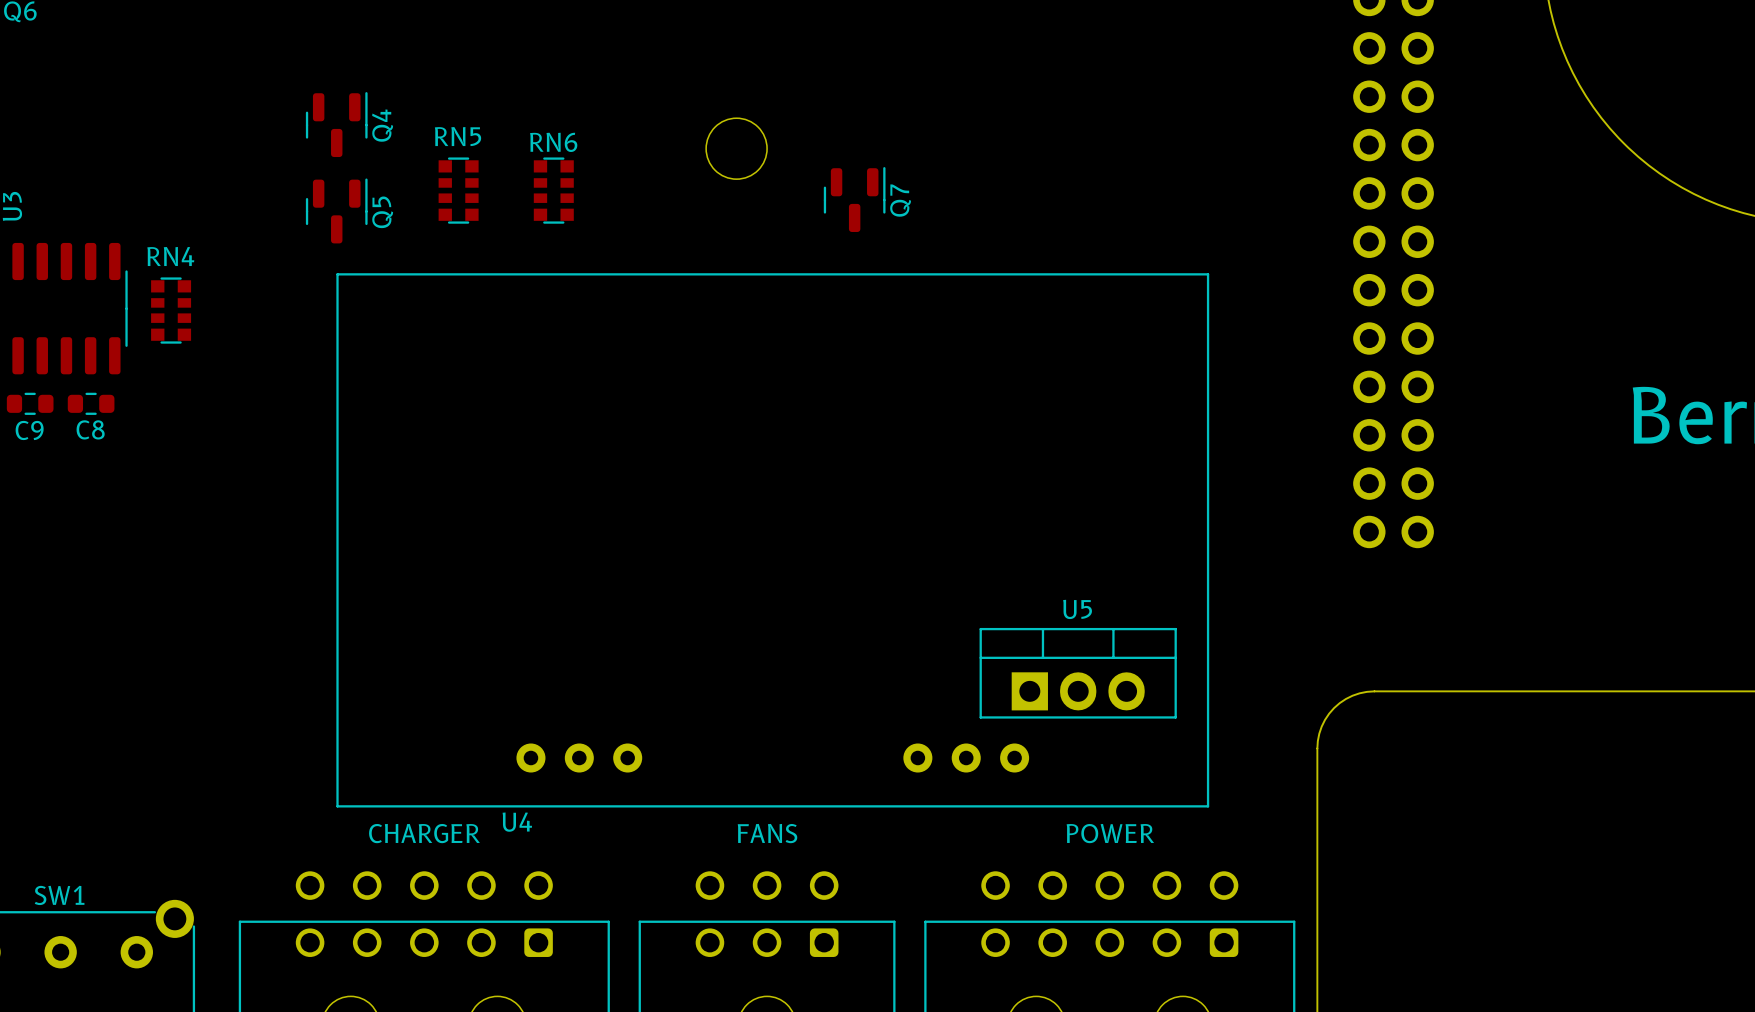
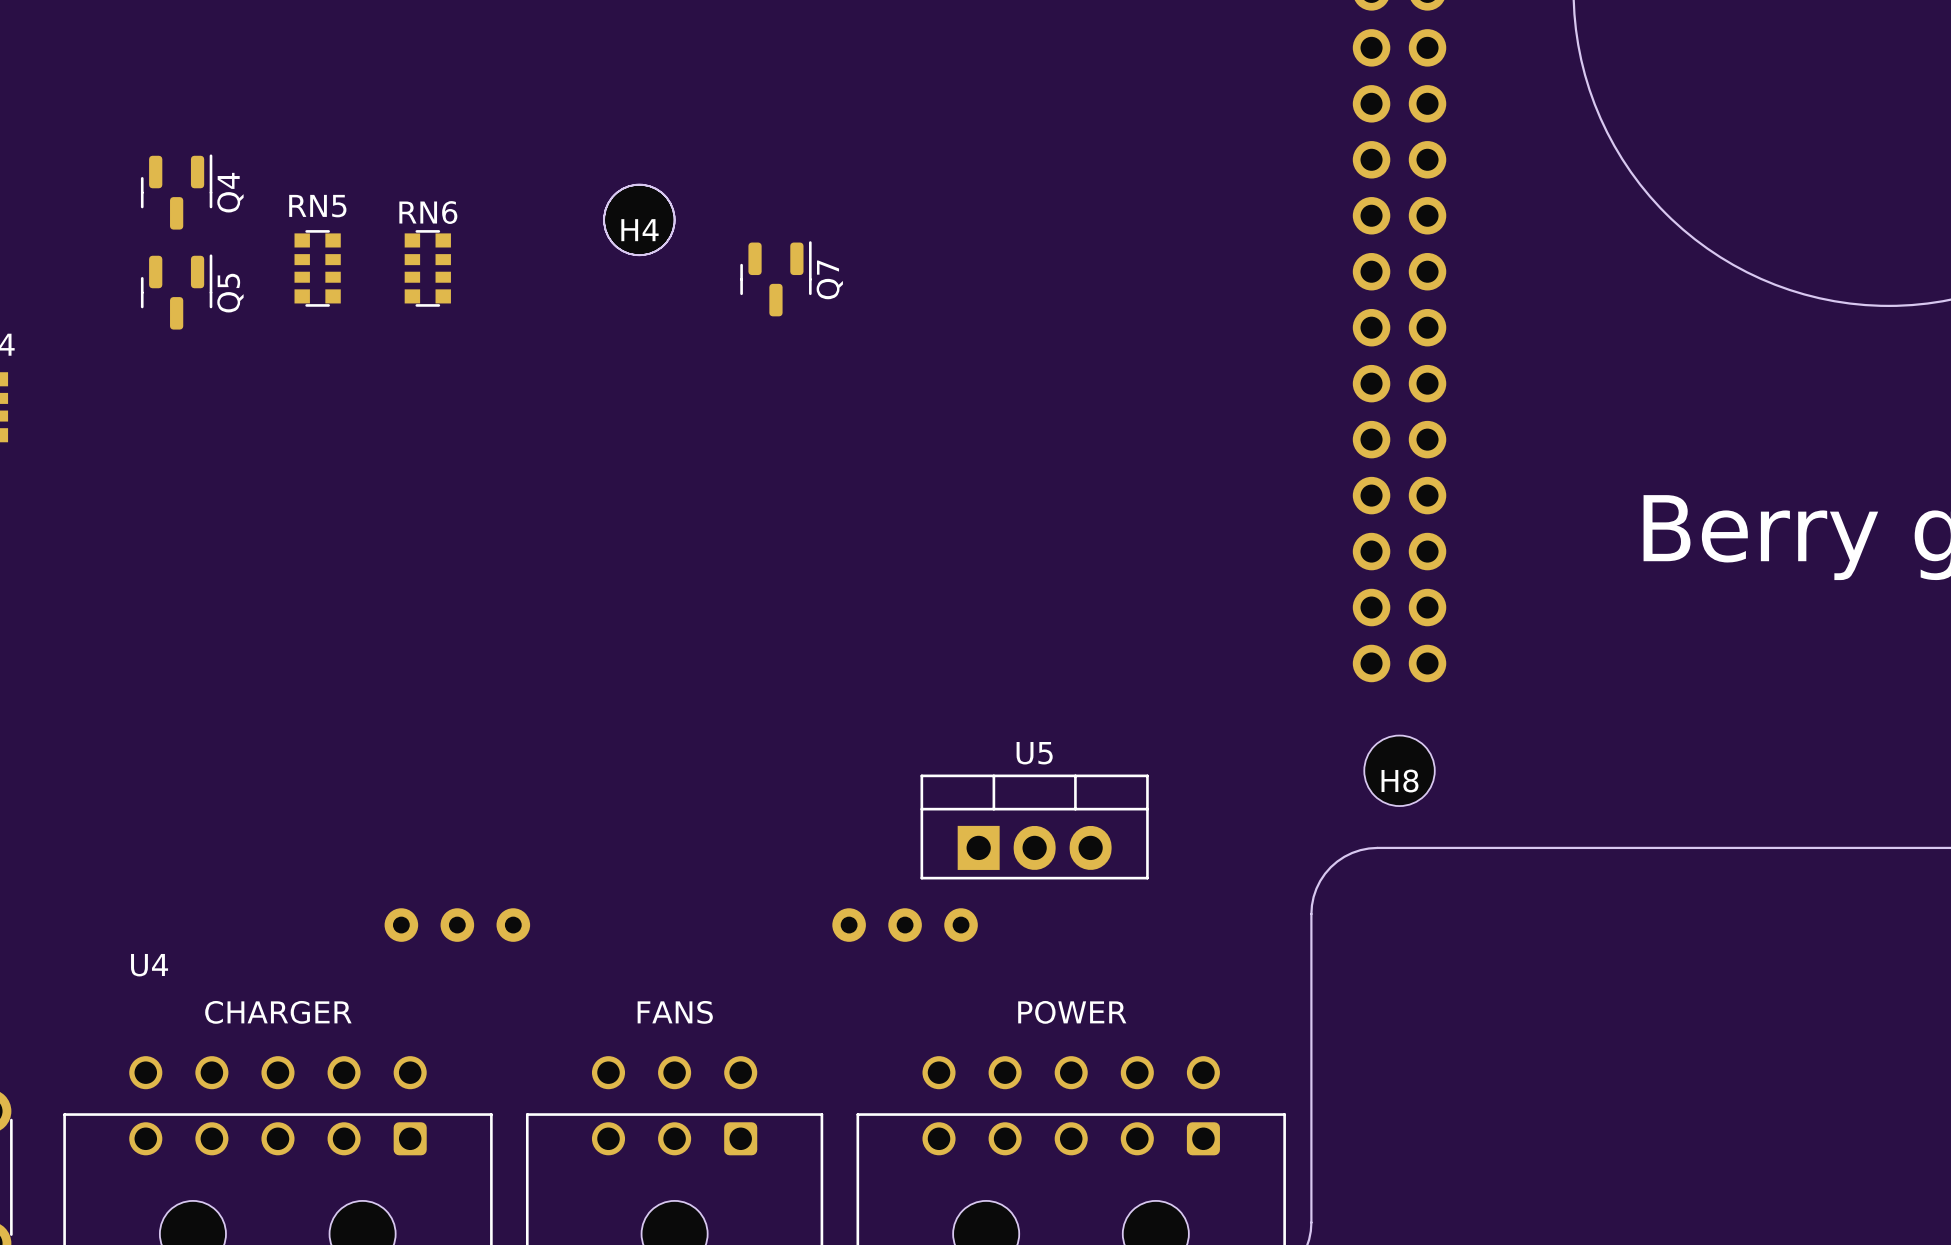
H4: none -> (639, 219)
U4 footprint: [336, 273, 1210, 808] -> [384, 908, 978, 942]
H8: none -> (1399, 770)
U4 name position: U4 (517, 822) -> U4 (149, 965)

